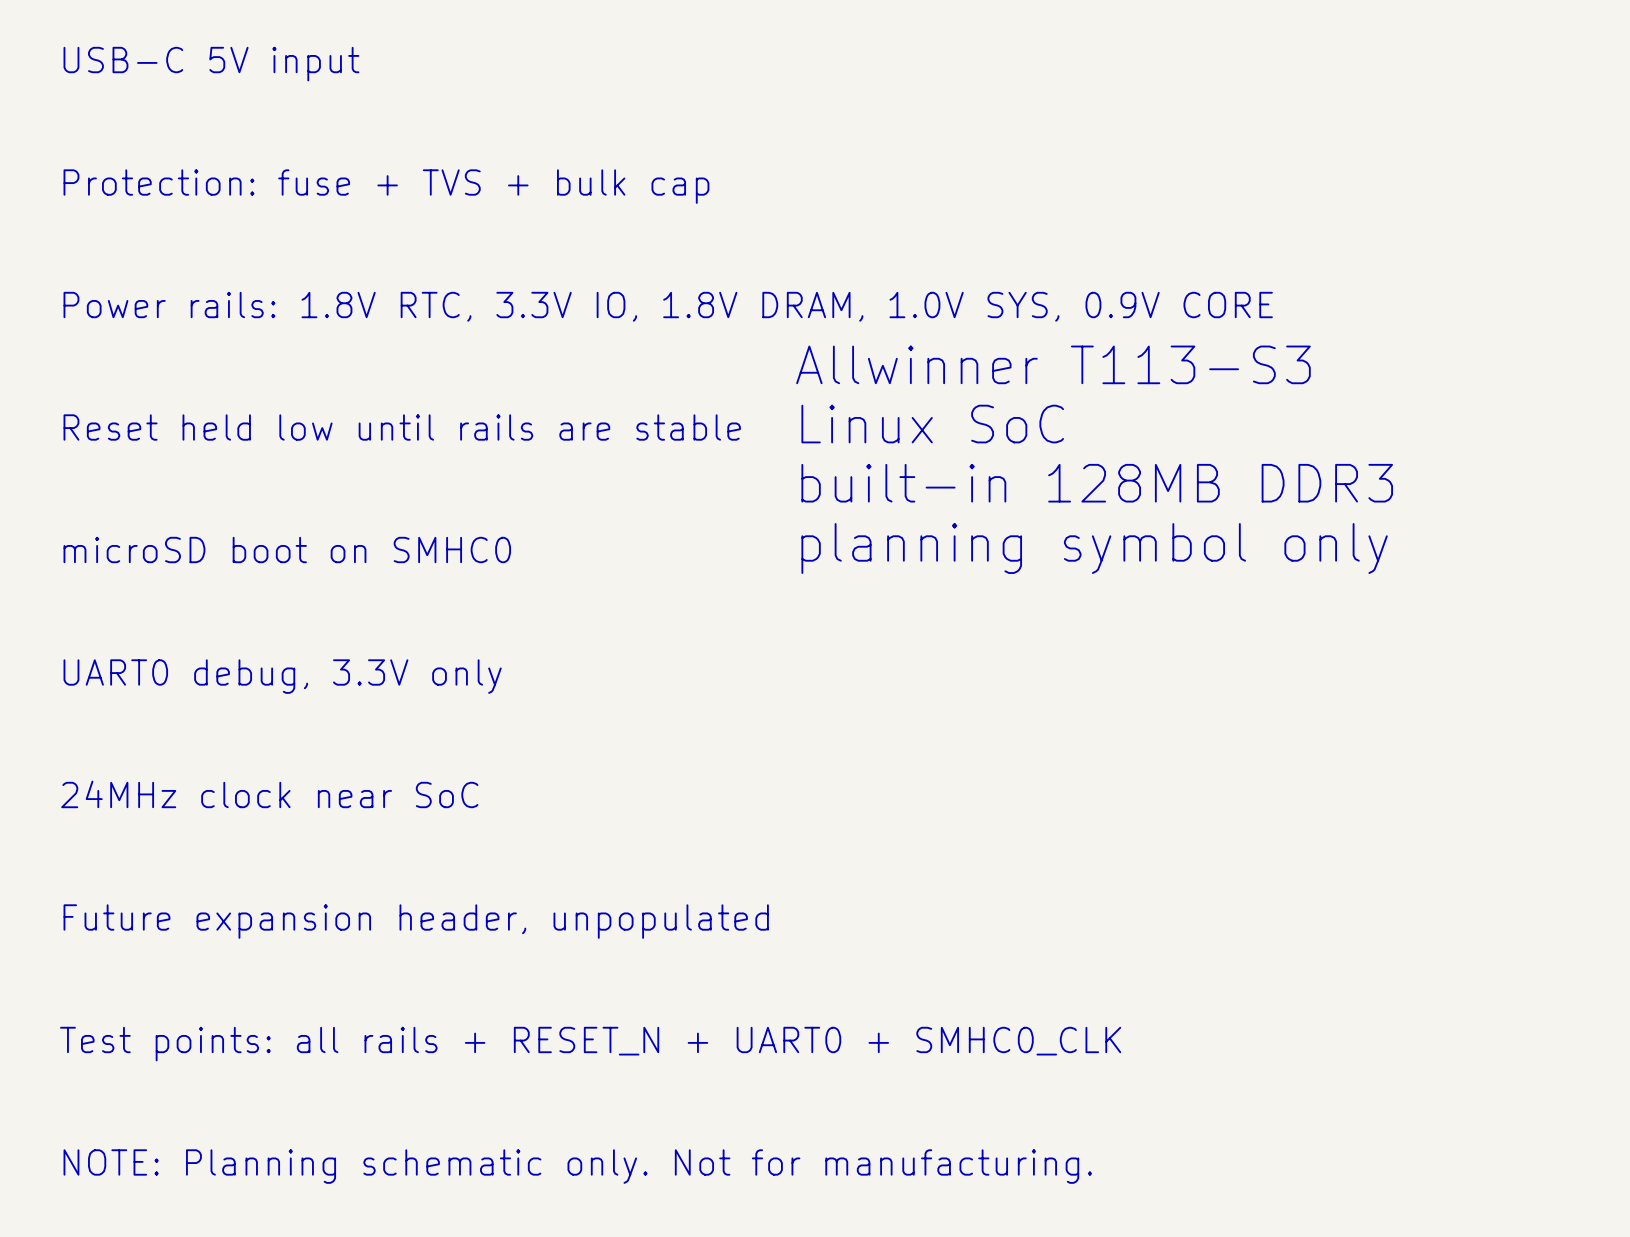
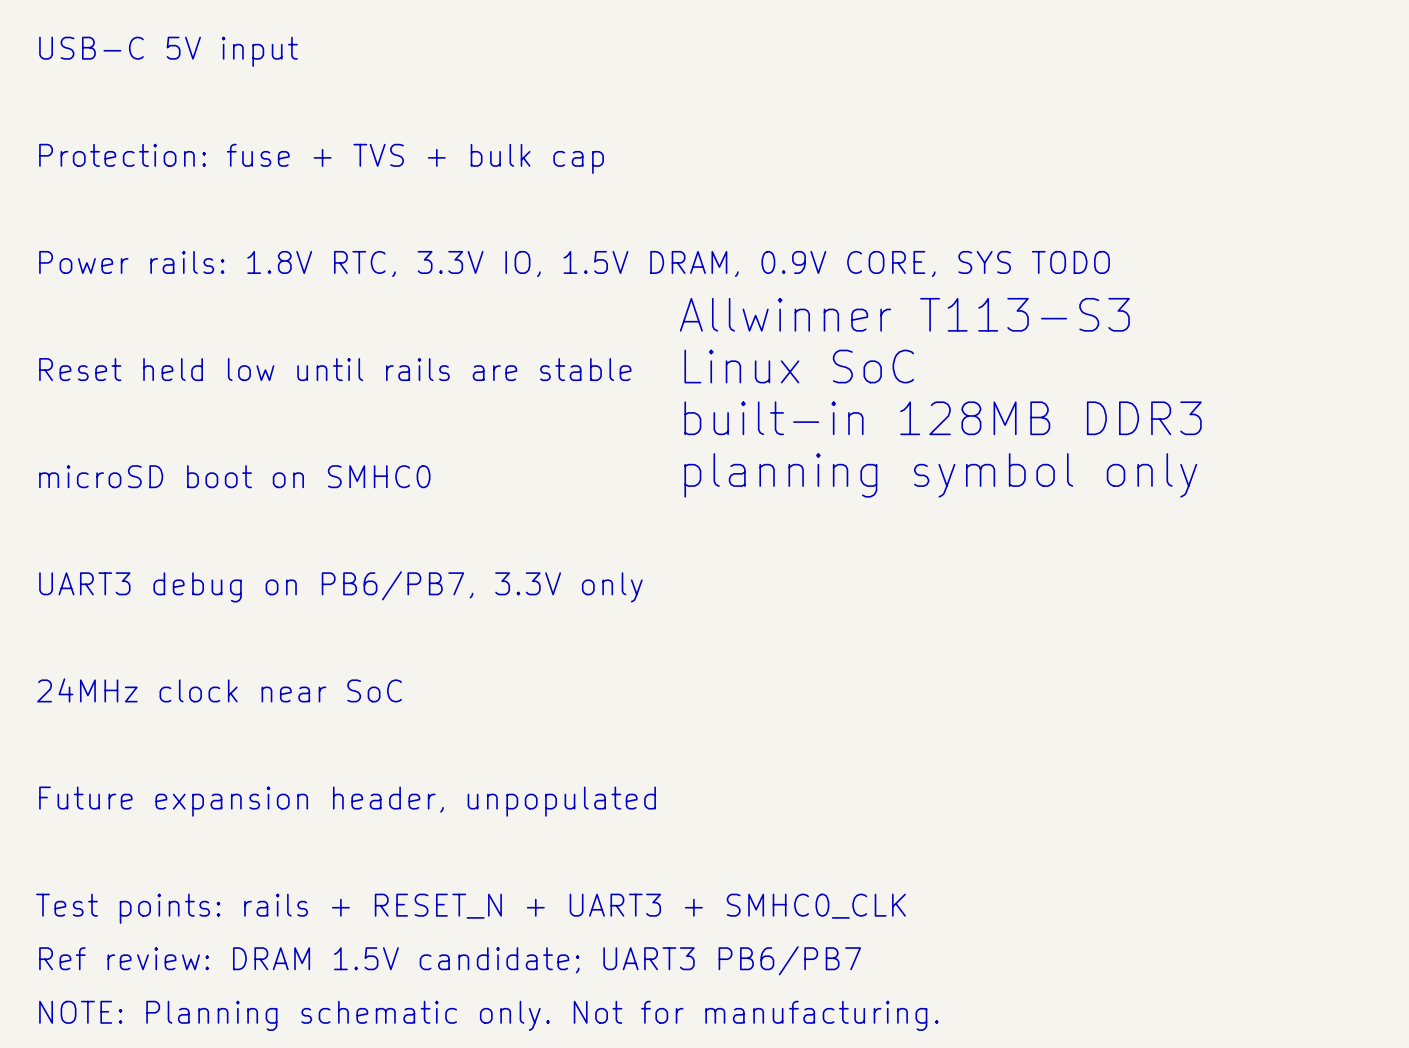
text: Power rails: 1.8V RTC, 3.3V IO, 1.8V DRAM, 1.0V SYS, 0.9V CORE (668, 306) -> Power rails: 1.8V RTC, 3.3V IO, 1.5V DRAM, 0.9V CORE, SYS TODO (574, 263)
text: UART0 debug, 3.3V only (282, 676) -> UART3 debug on PB6/PB7, 3.3V only (340, 586)
text: Test points: all rails + RESET_N + UART0 + SMHC0_CLK (590, 1044) -> Test points: rails + RESET_N + UART3 + SMHC0_CLK (470, 908)
text: none -> Ref review: DRAM 1.5V candidate; UART3 PB6/PB7 (450, 960)

